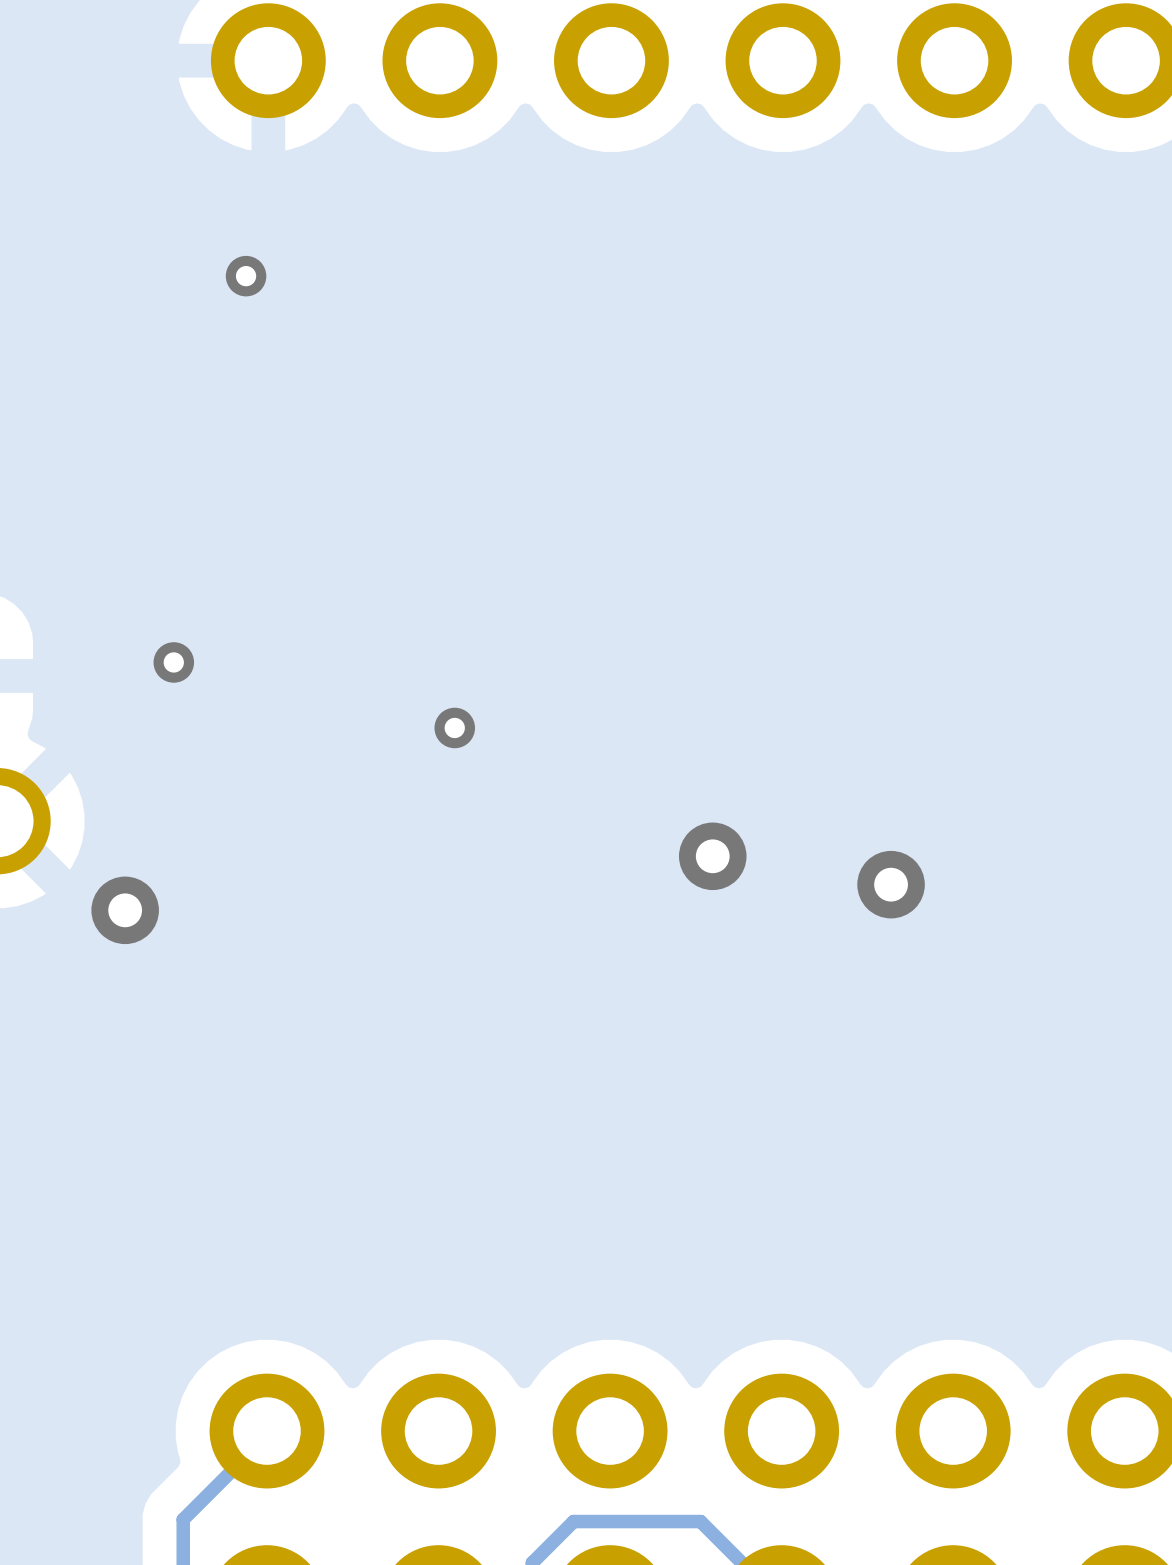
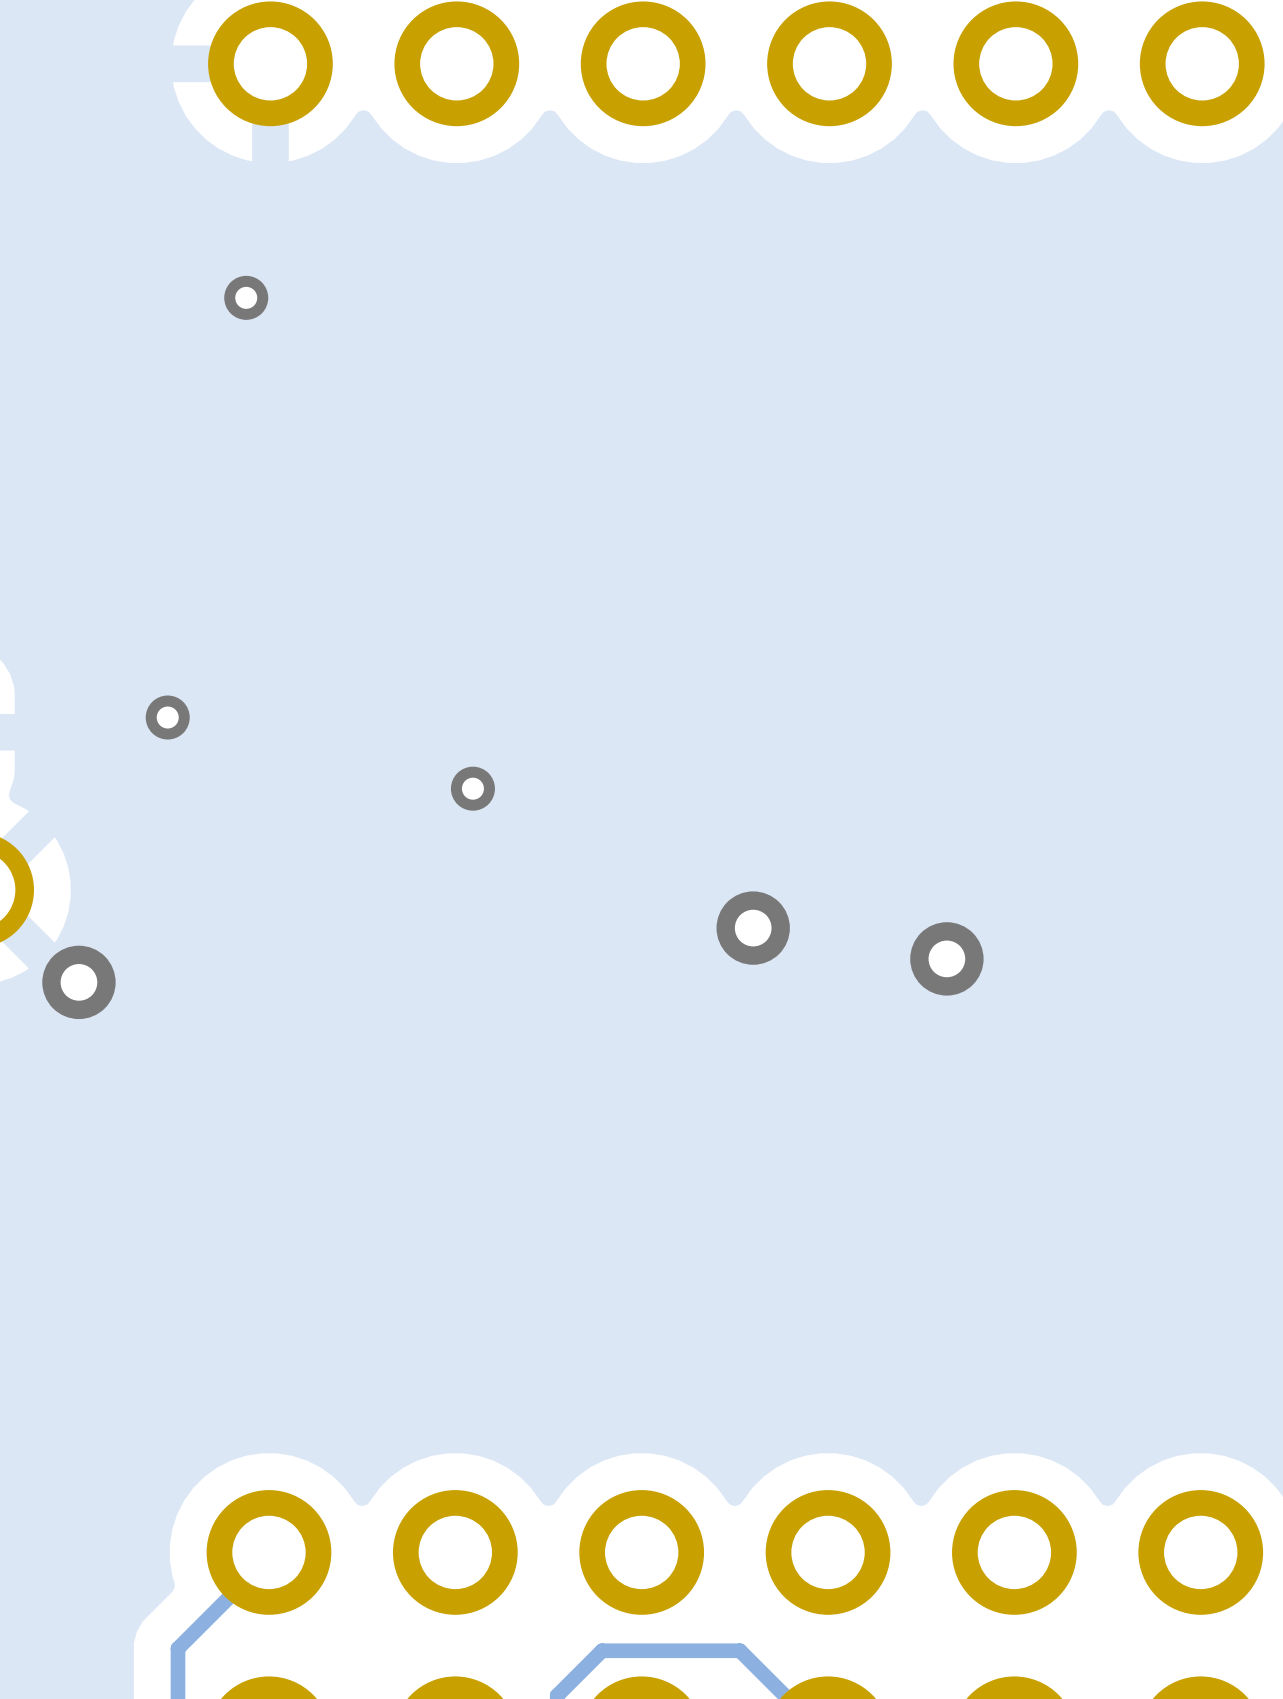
via position: (125, 910) -> (78, 982)

